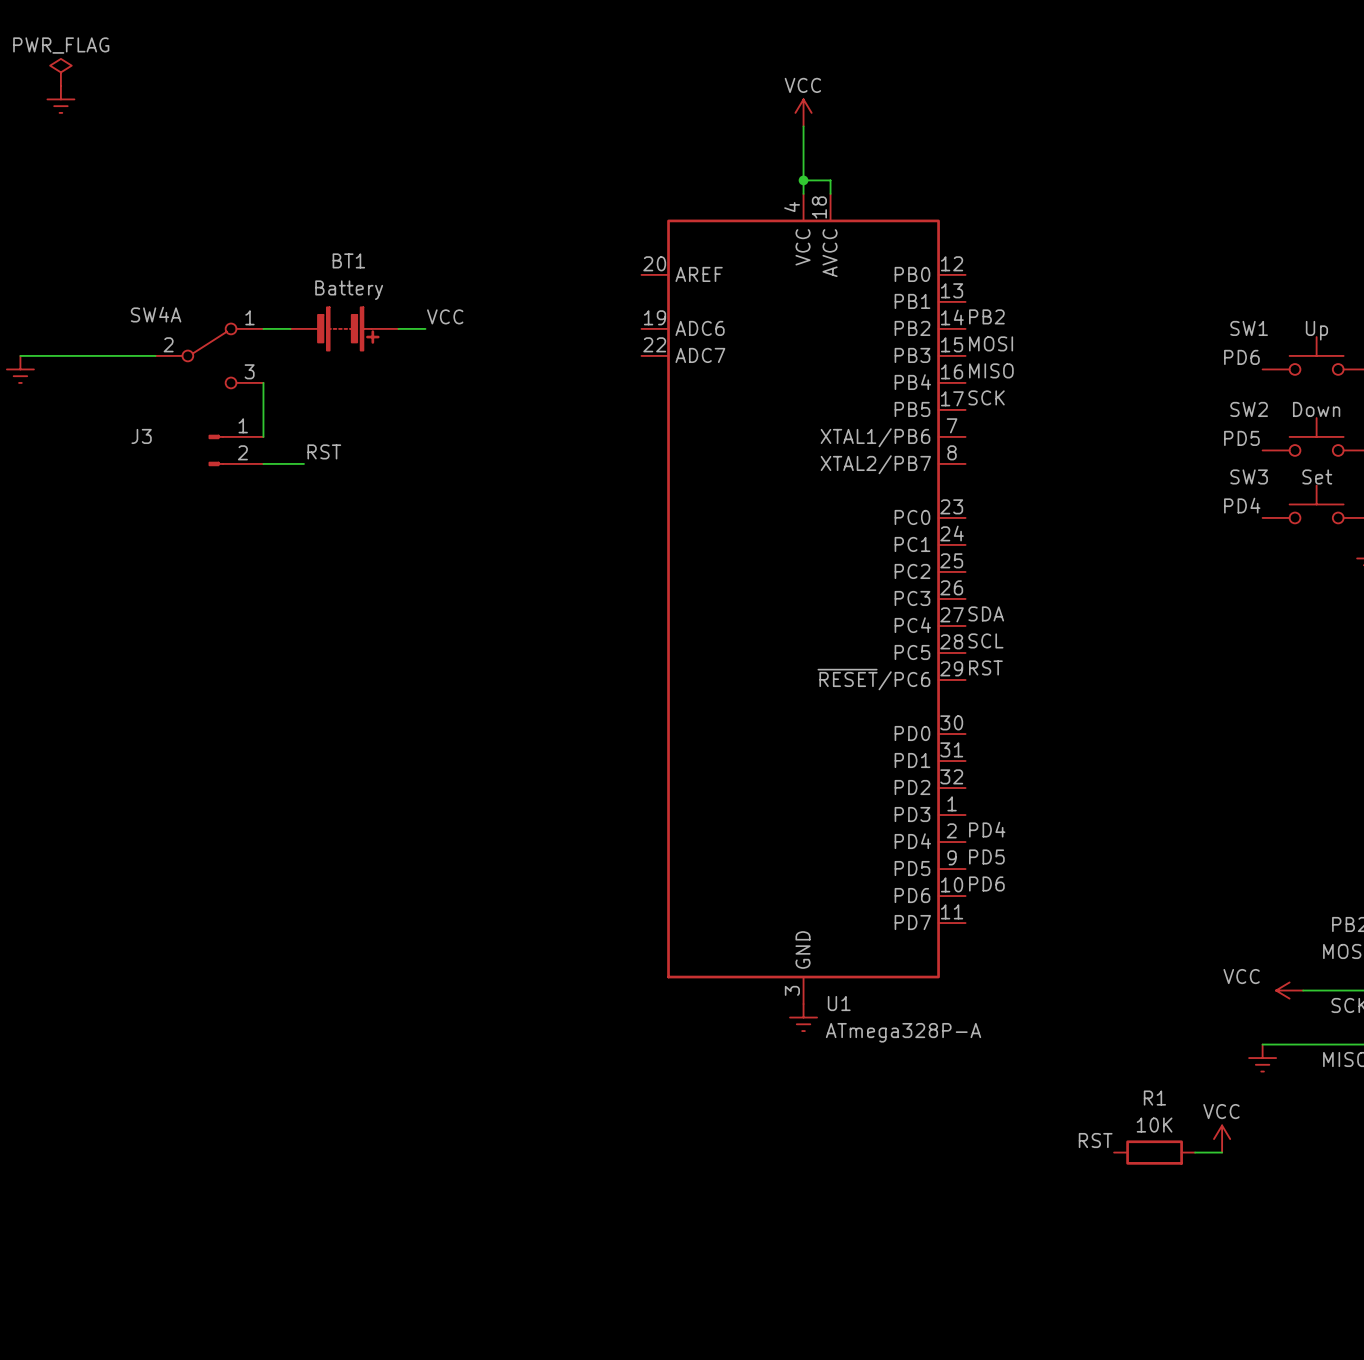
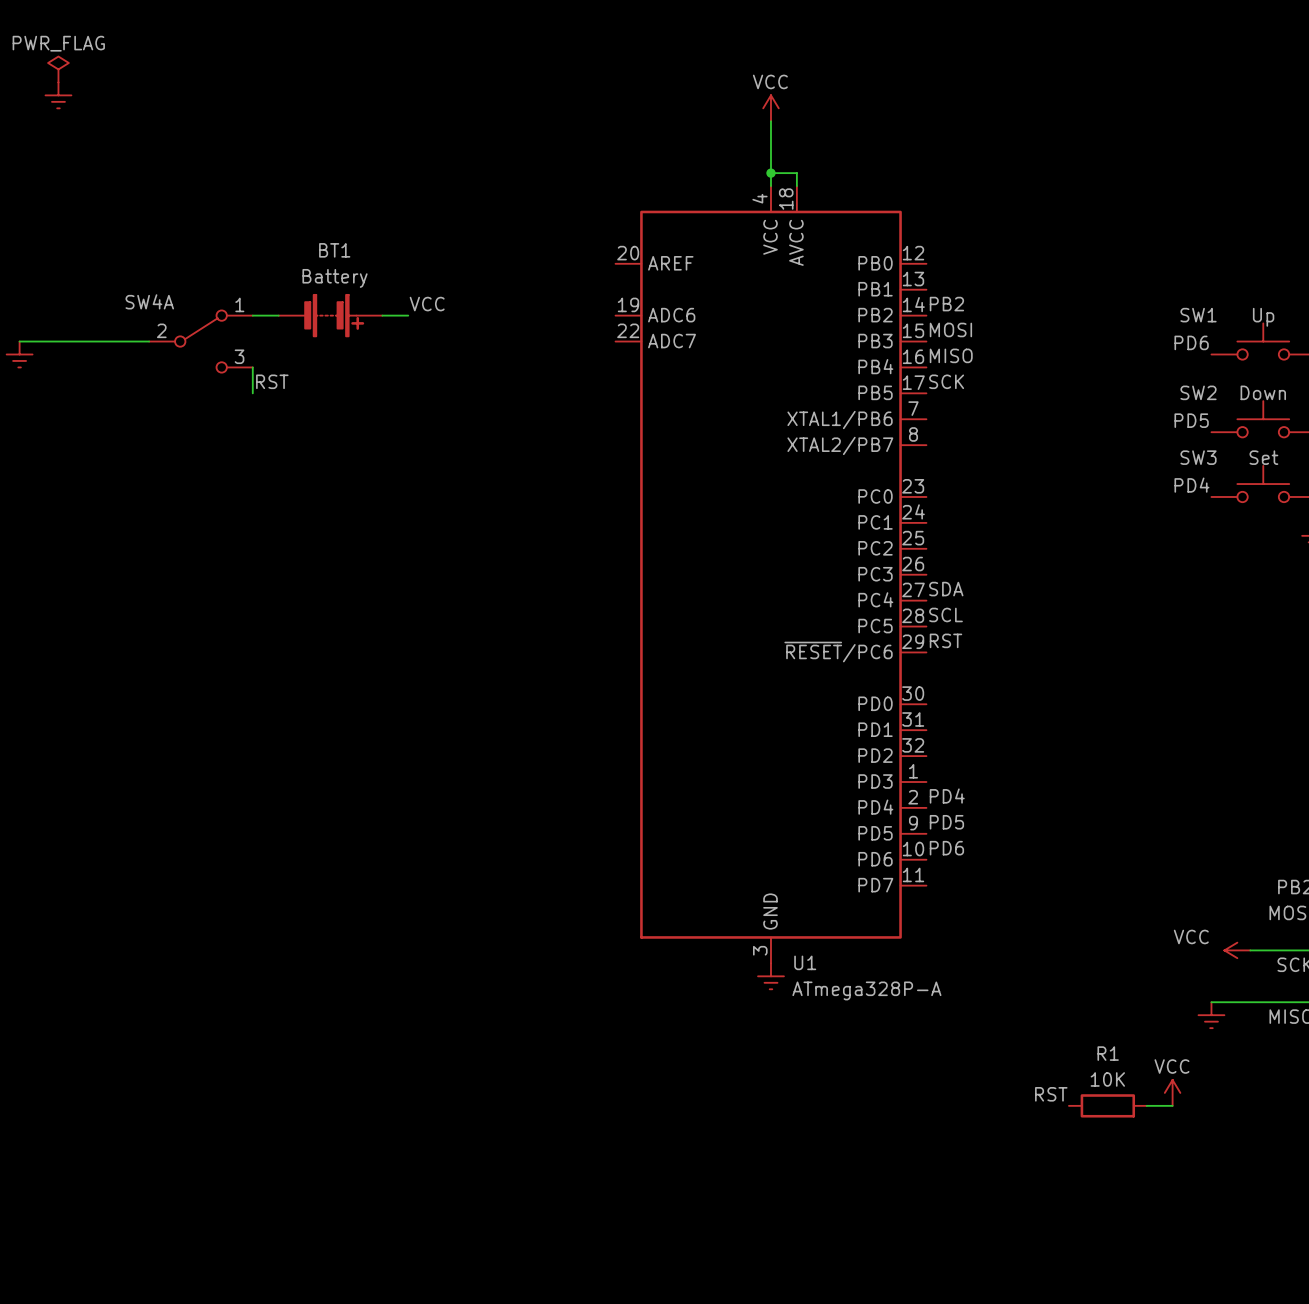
wire: (263, 409) (263, 436) -> none
J3: (236, 450) -> none
label position: RST (324, 451) -> RST (272, 381)
wire: (263, 463) (303, 463) -> none

